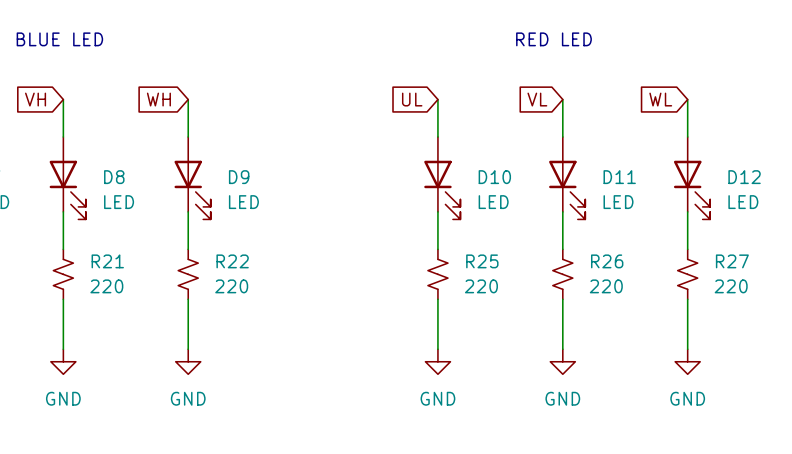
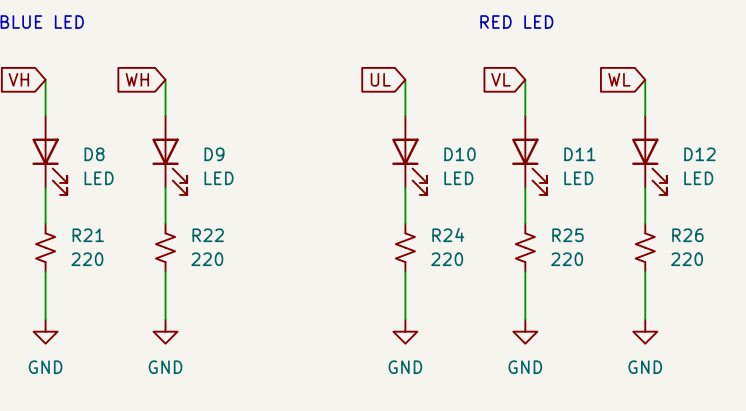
R25 name: R25 (482, 261) -> R24 (448, 234)
R26 name: R26 (607, 261) -> R25 (567, 235)
R27 name: R27 (732, 261) -> R26 (687, 235)

